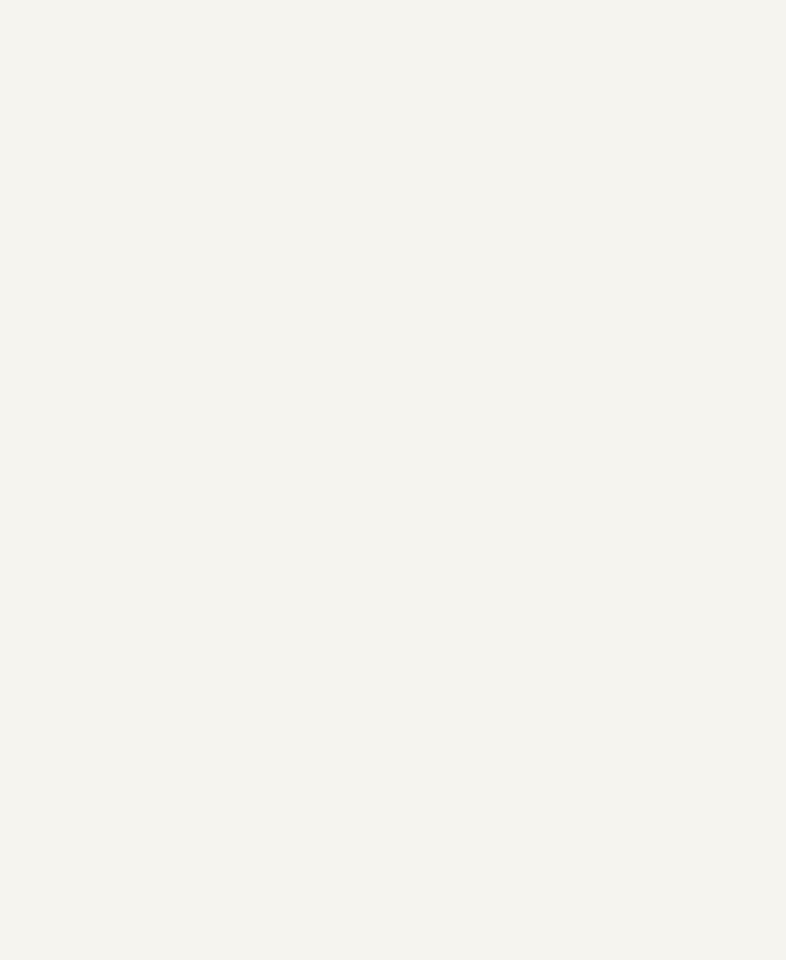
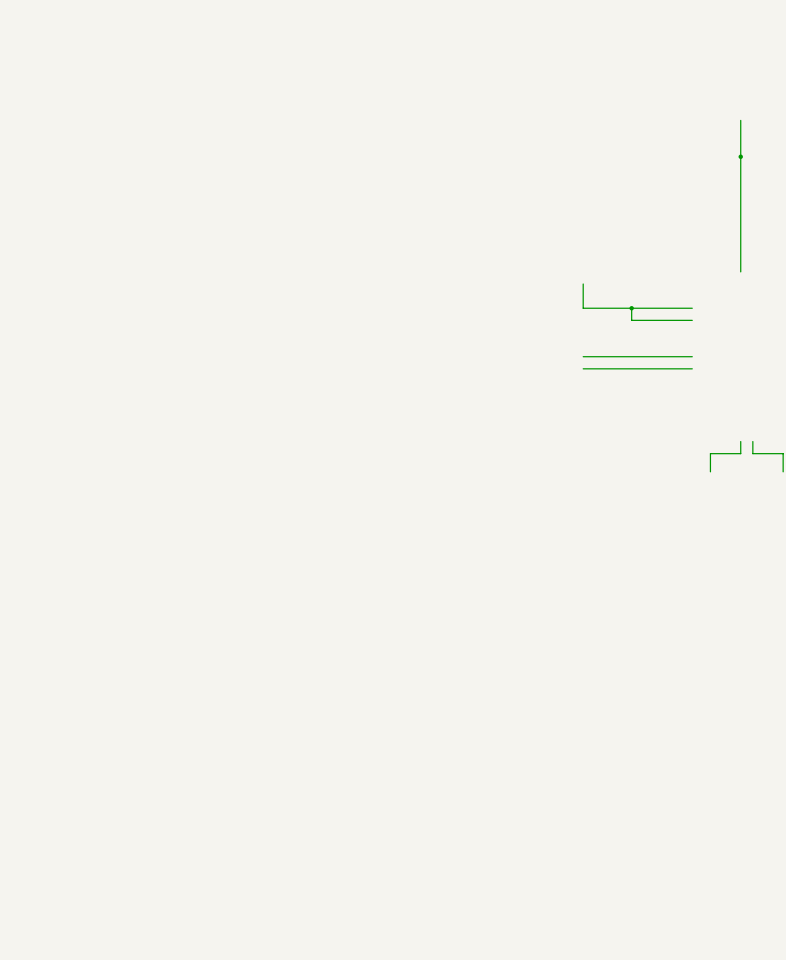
wire: none -> (740, 120) (740, 271)
junction: none -> (740, 156)
wire: none -> (583, 284) (583, 308) (692, 308)
wire: none -> (631, 308) (631, 320) (692, 320)
junction: none -> (631, 308)
wire: none -> (583, 356) (692, 356)
wire: none -> (583, 368) (692, 368)
wire: none -> (740, 441) (740, 453) (710, 453) (710, 471)
wire: none -> (752, 441) (752, 453) (783, 453) (783, 471)

